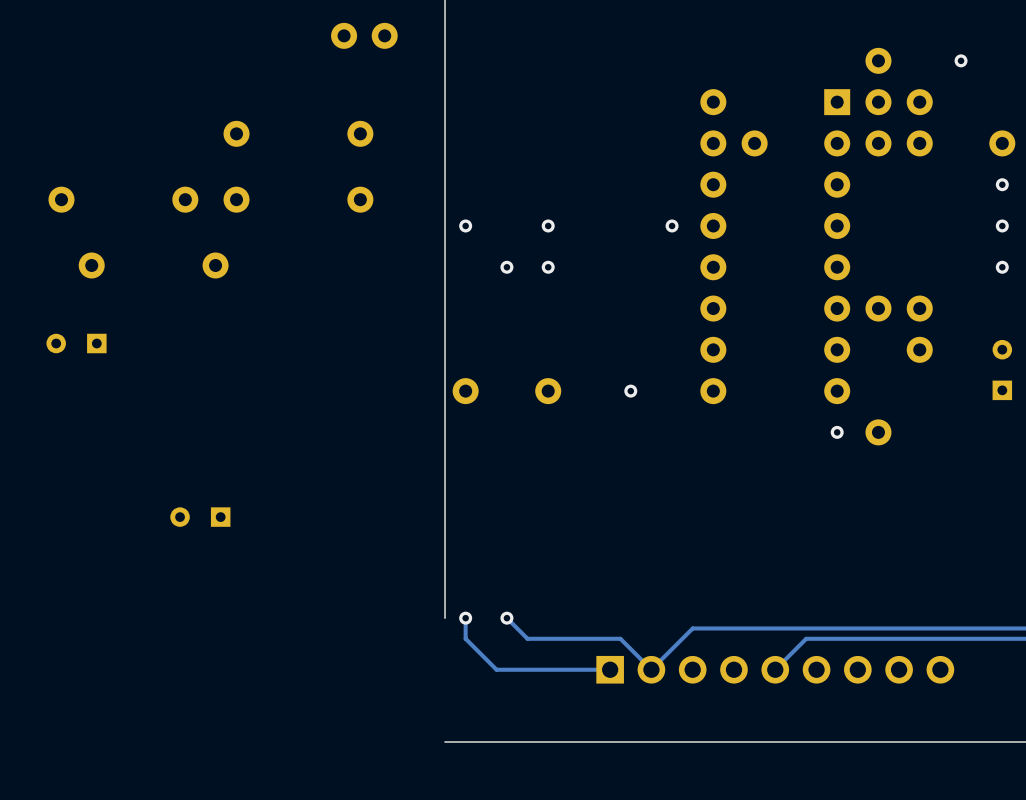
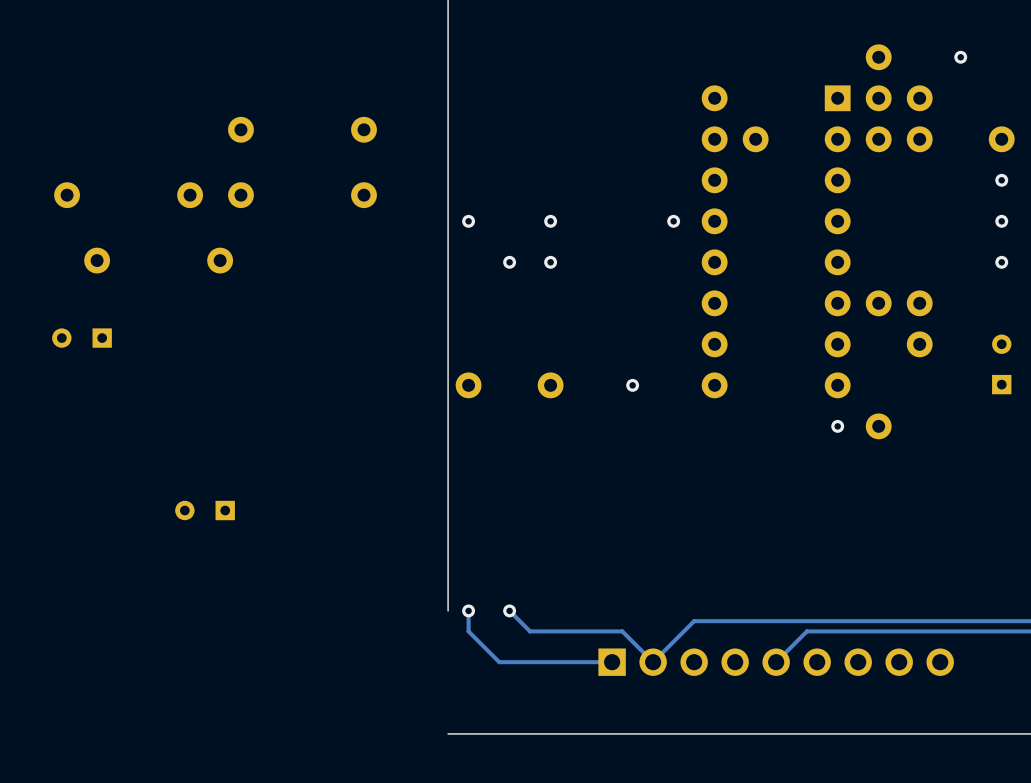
part: (364, 35) -> none

